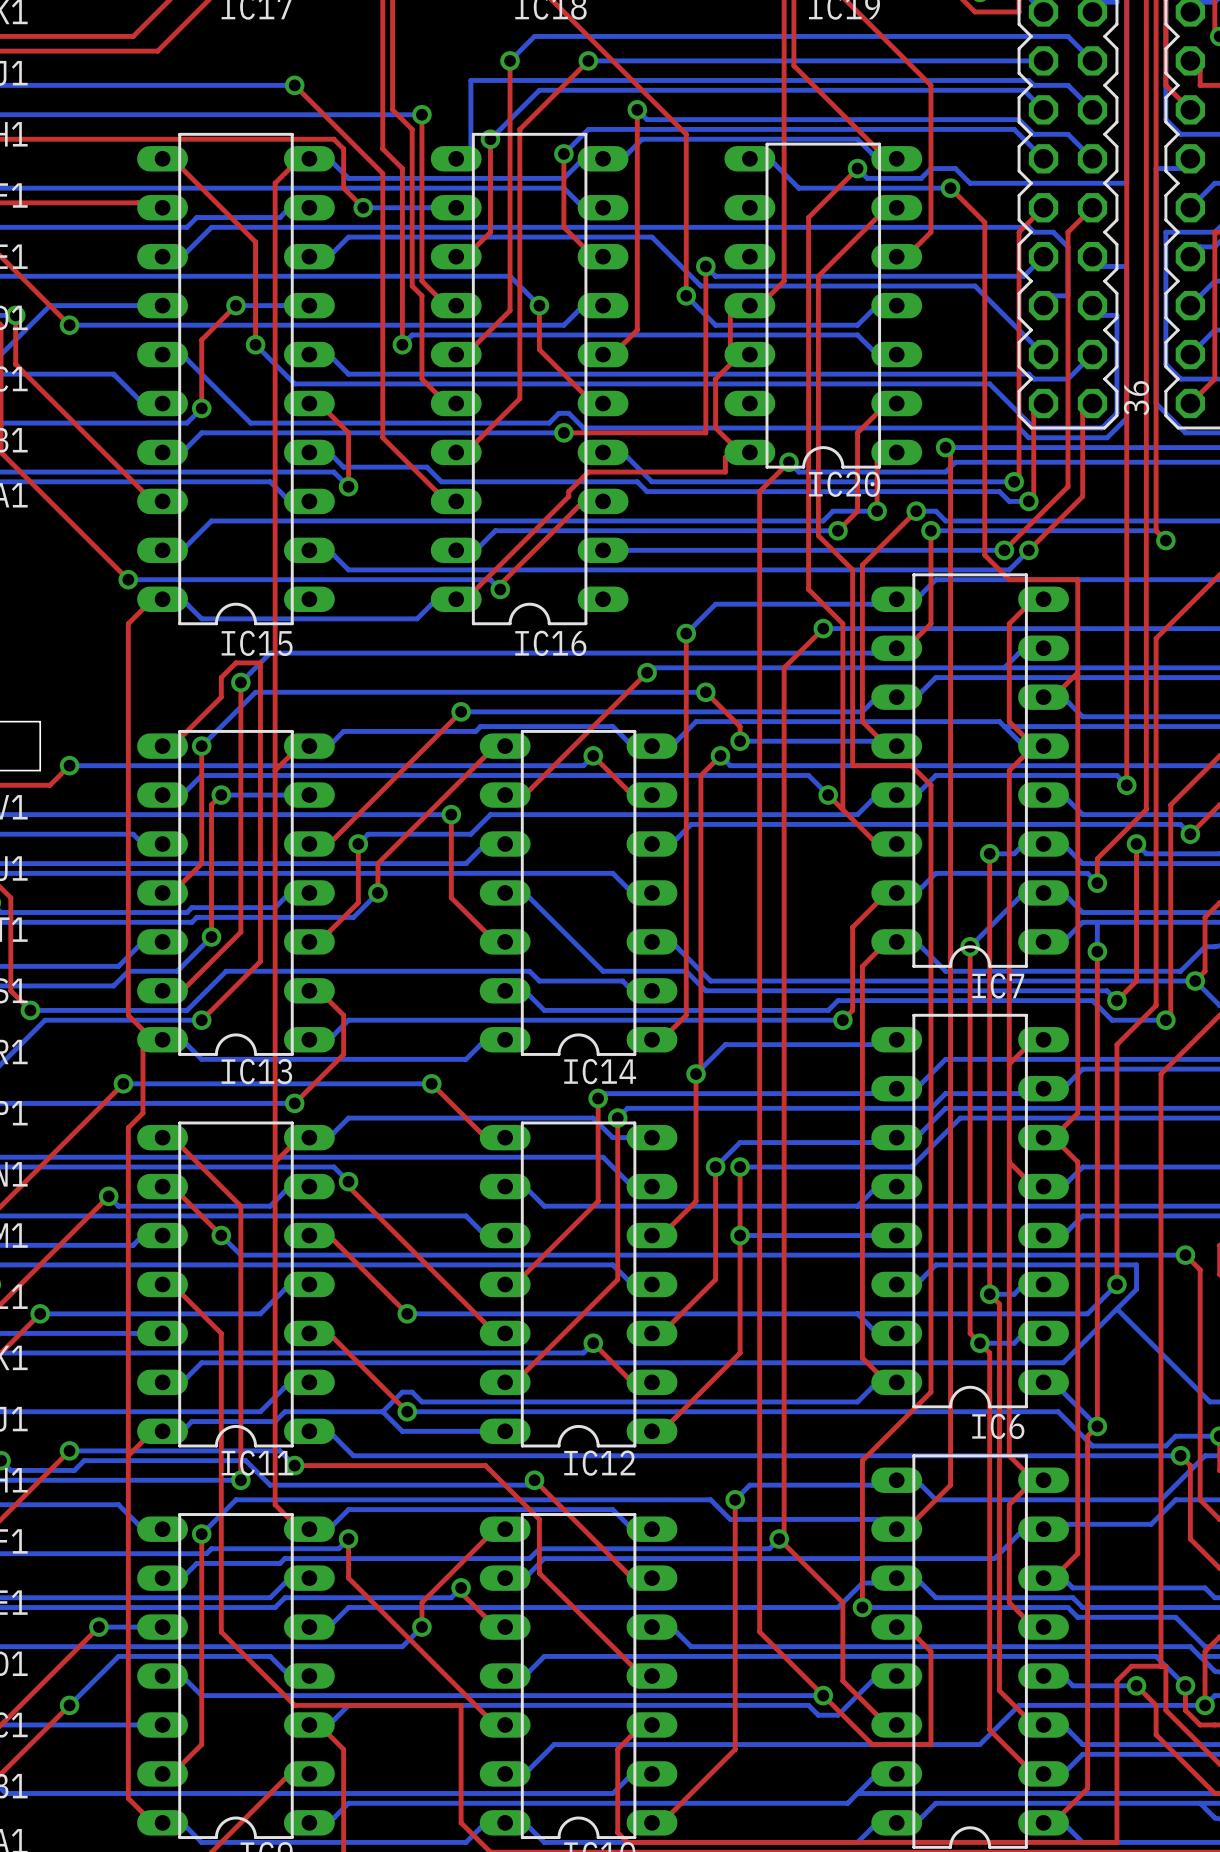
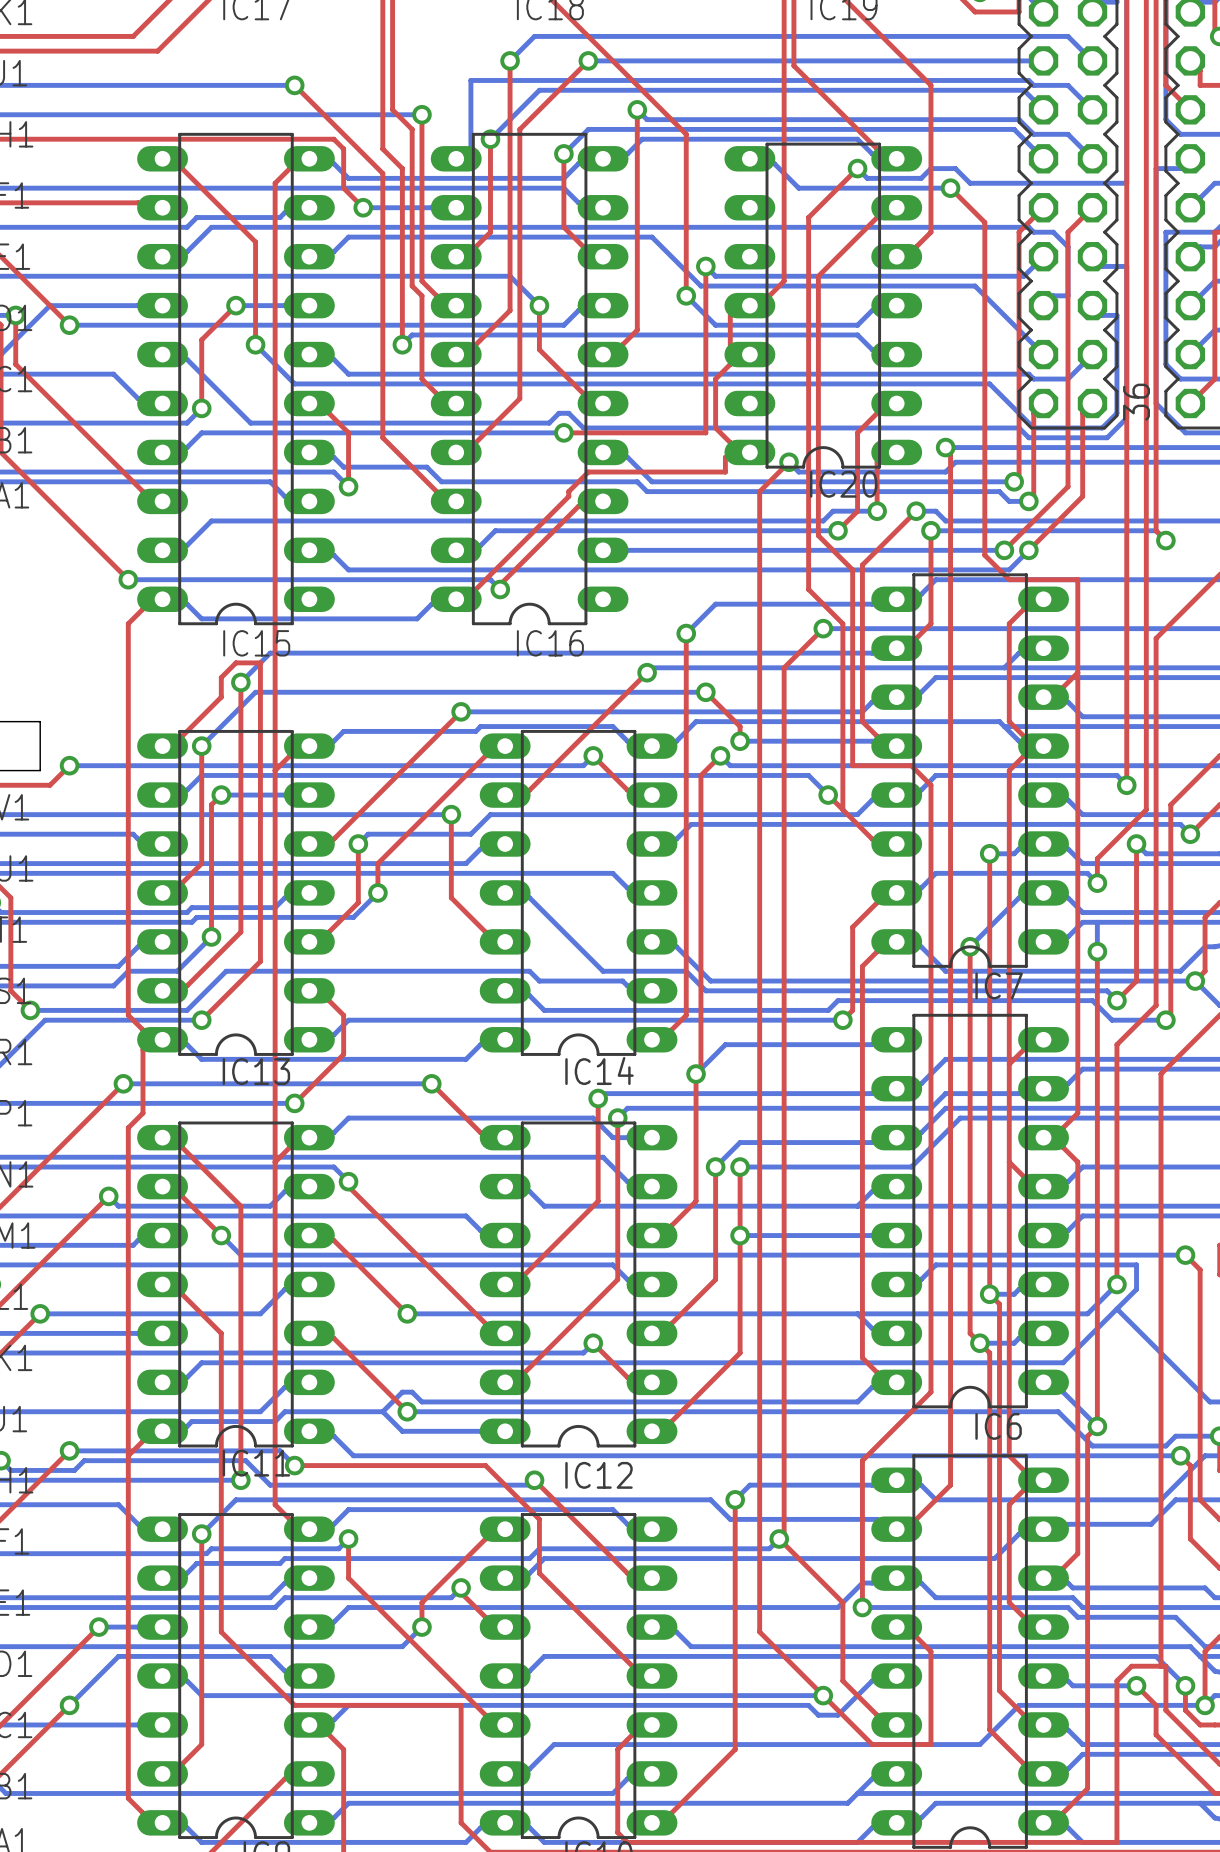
IC12 name position: IC12 (599, 1463) -> IC12 (598, 1475)

